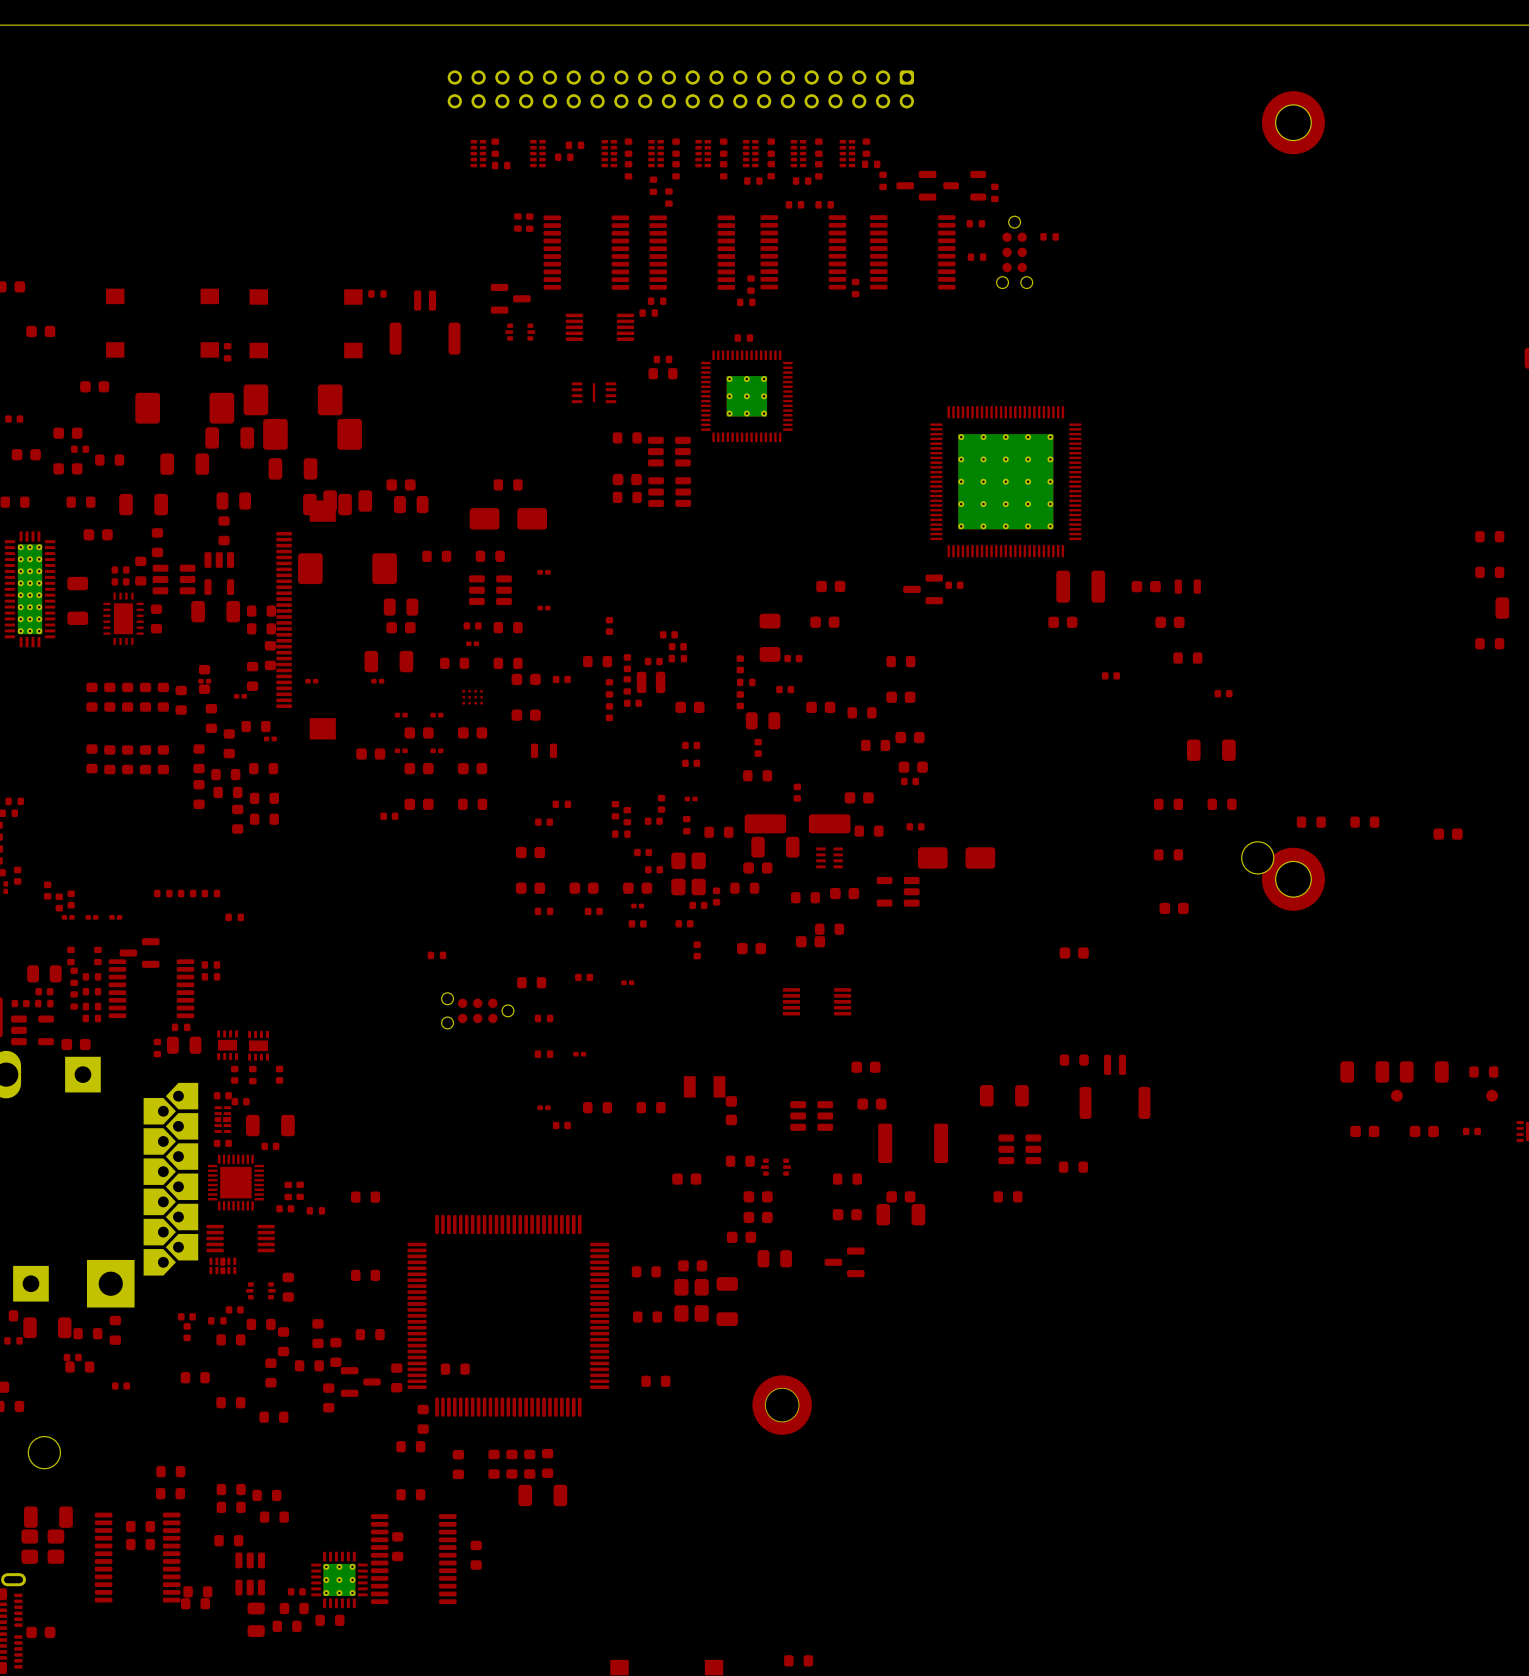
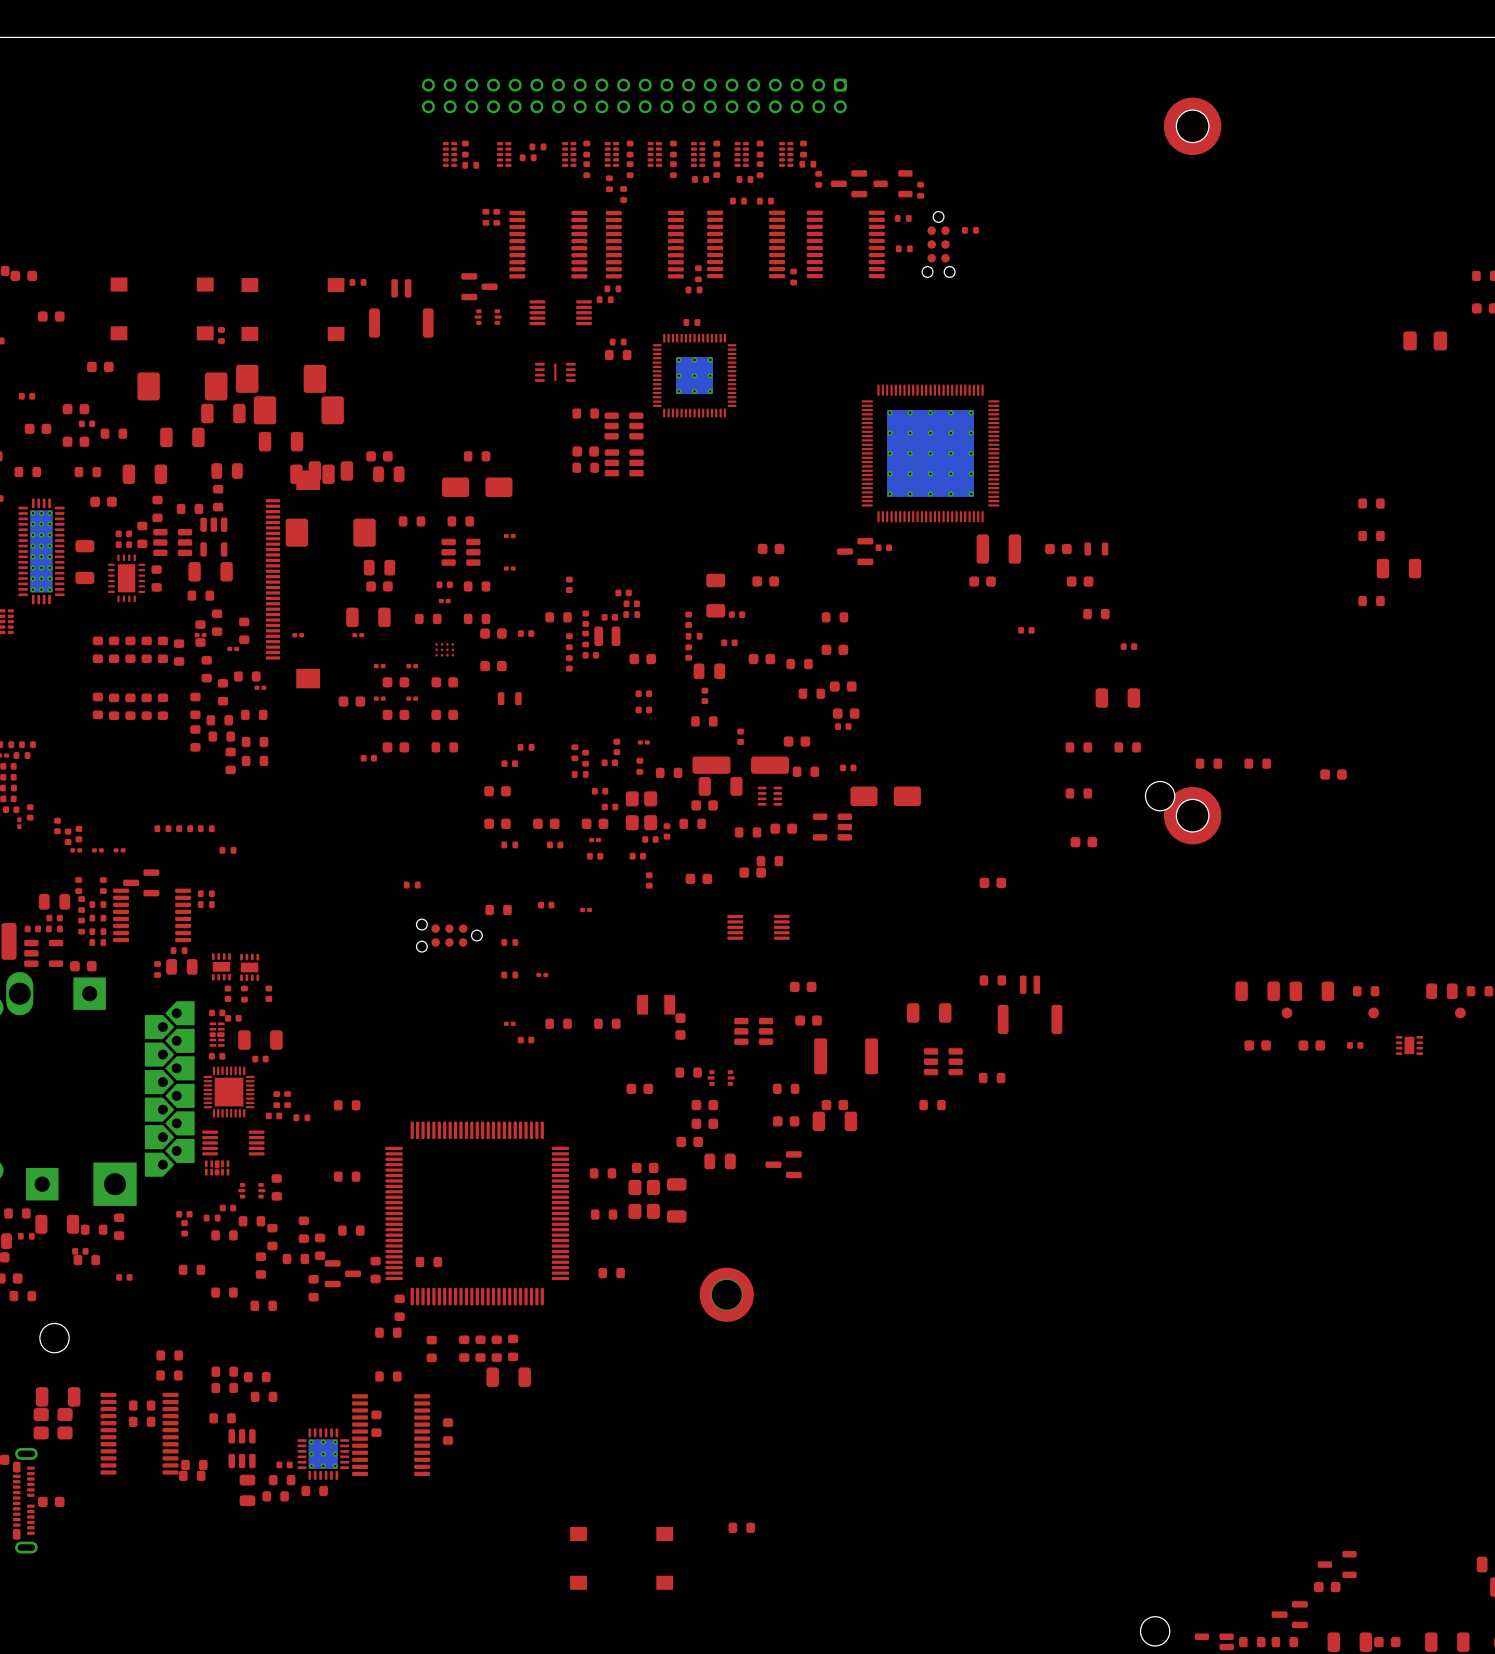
part: none -> (190, 508)
part: (261, 611) -> none
part: (261, 628) -> none
part: none -> (200, 595)
part: (270, 655) -> none
part: none -> (217, 622)

